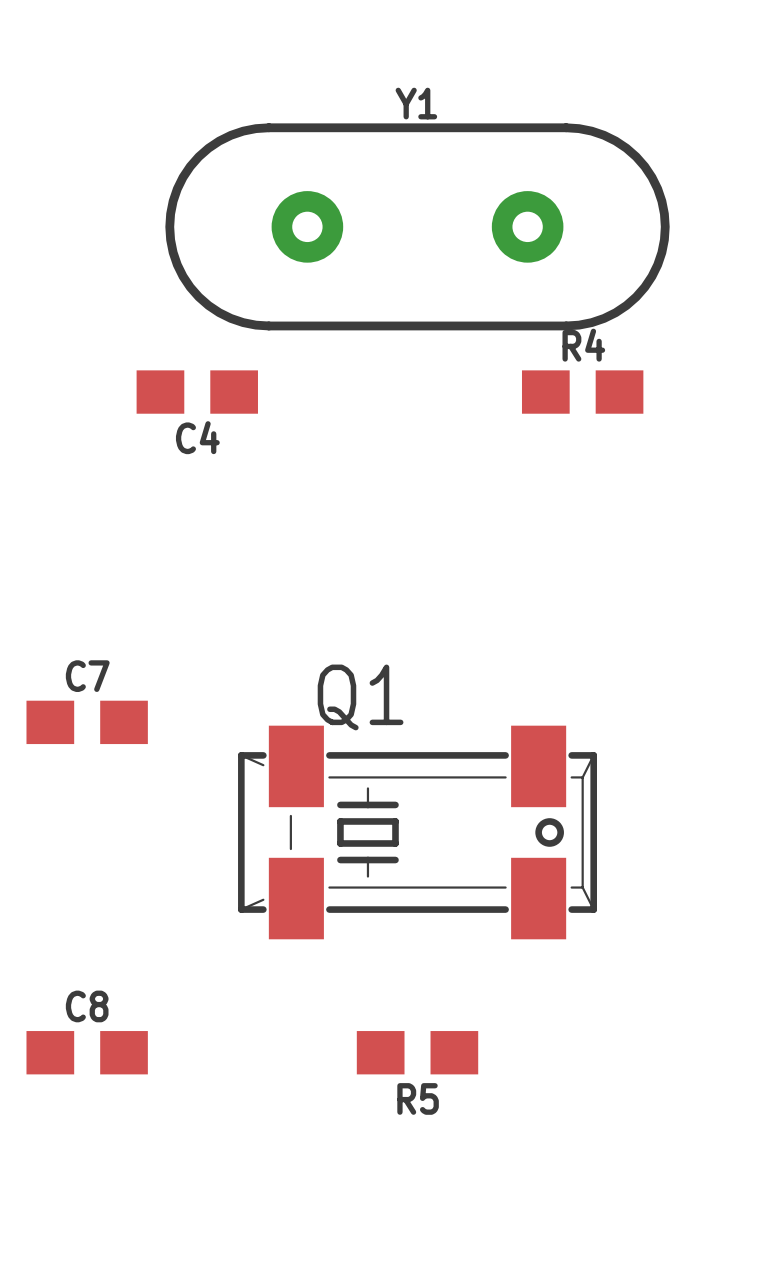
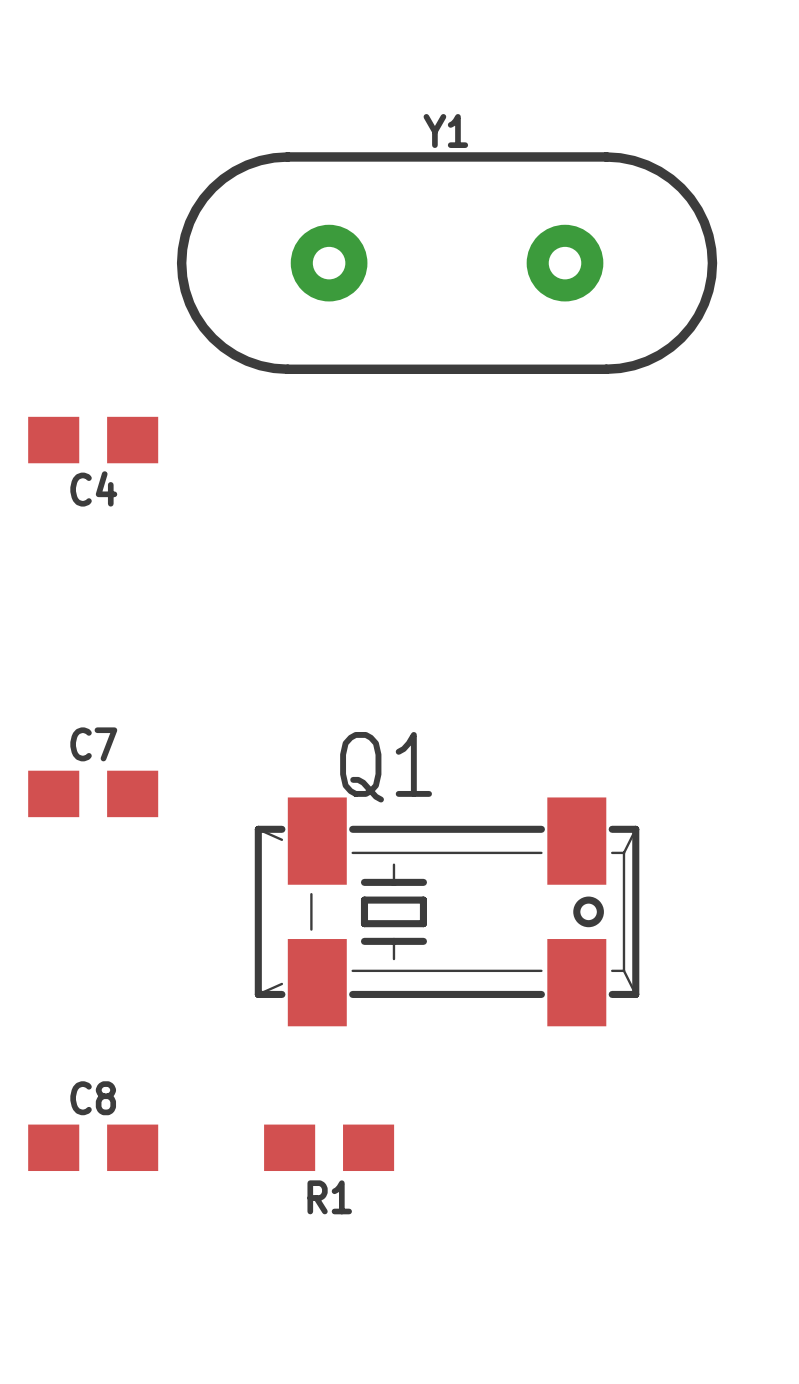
C4 position: (197, 392) -> (93, 440)
R4: (582, 392) -> none
R1: none -> (329, 1147)
R5: (417, 1052) -> none

